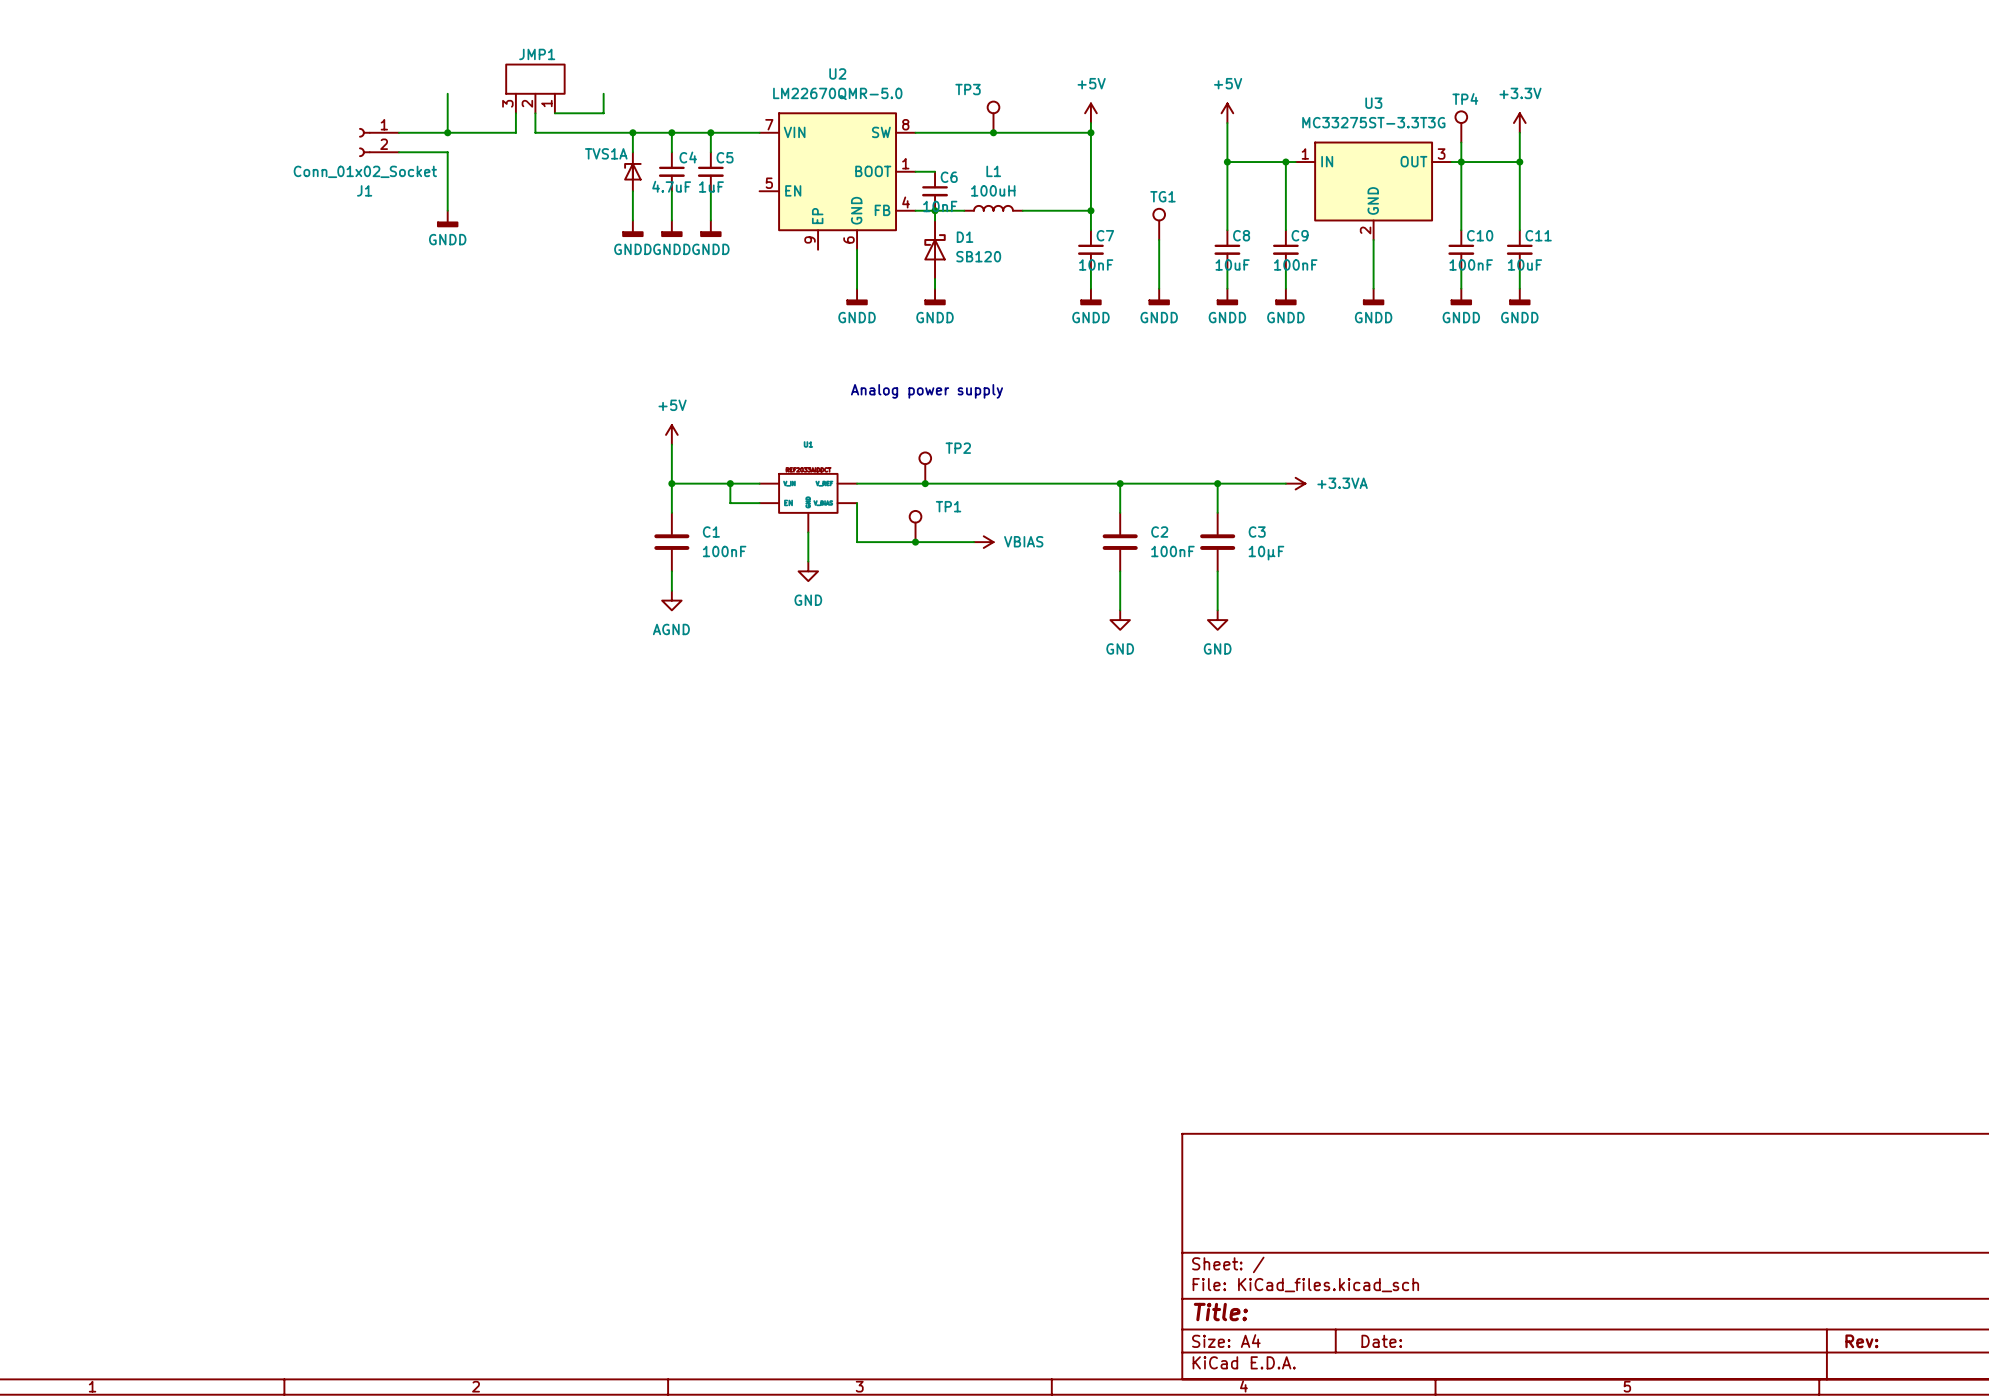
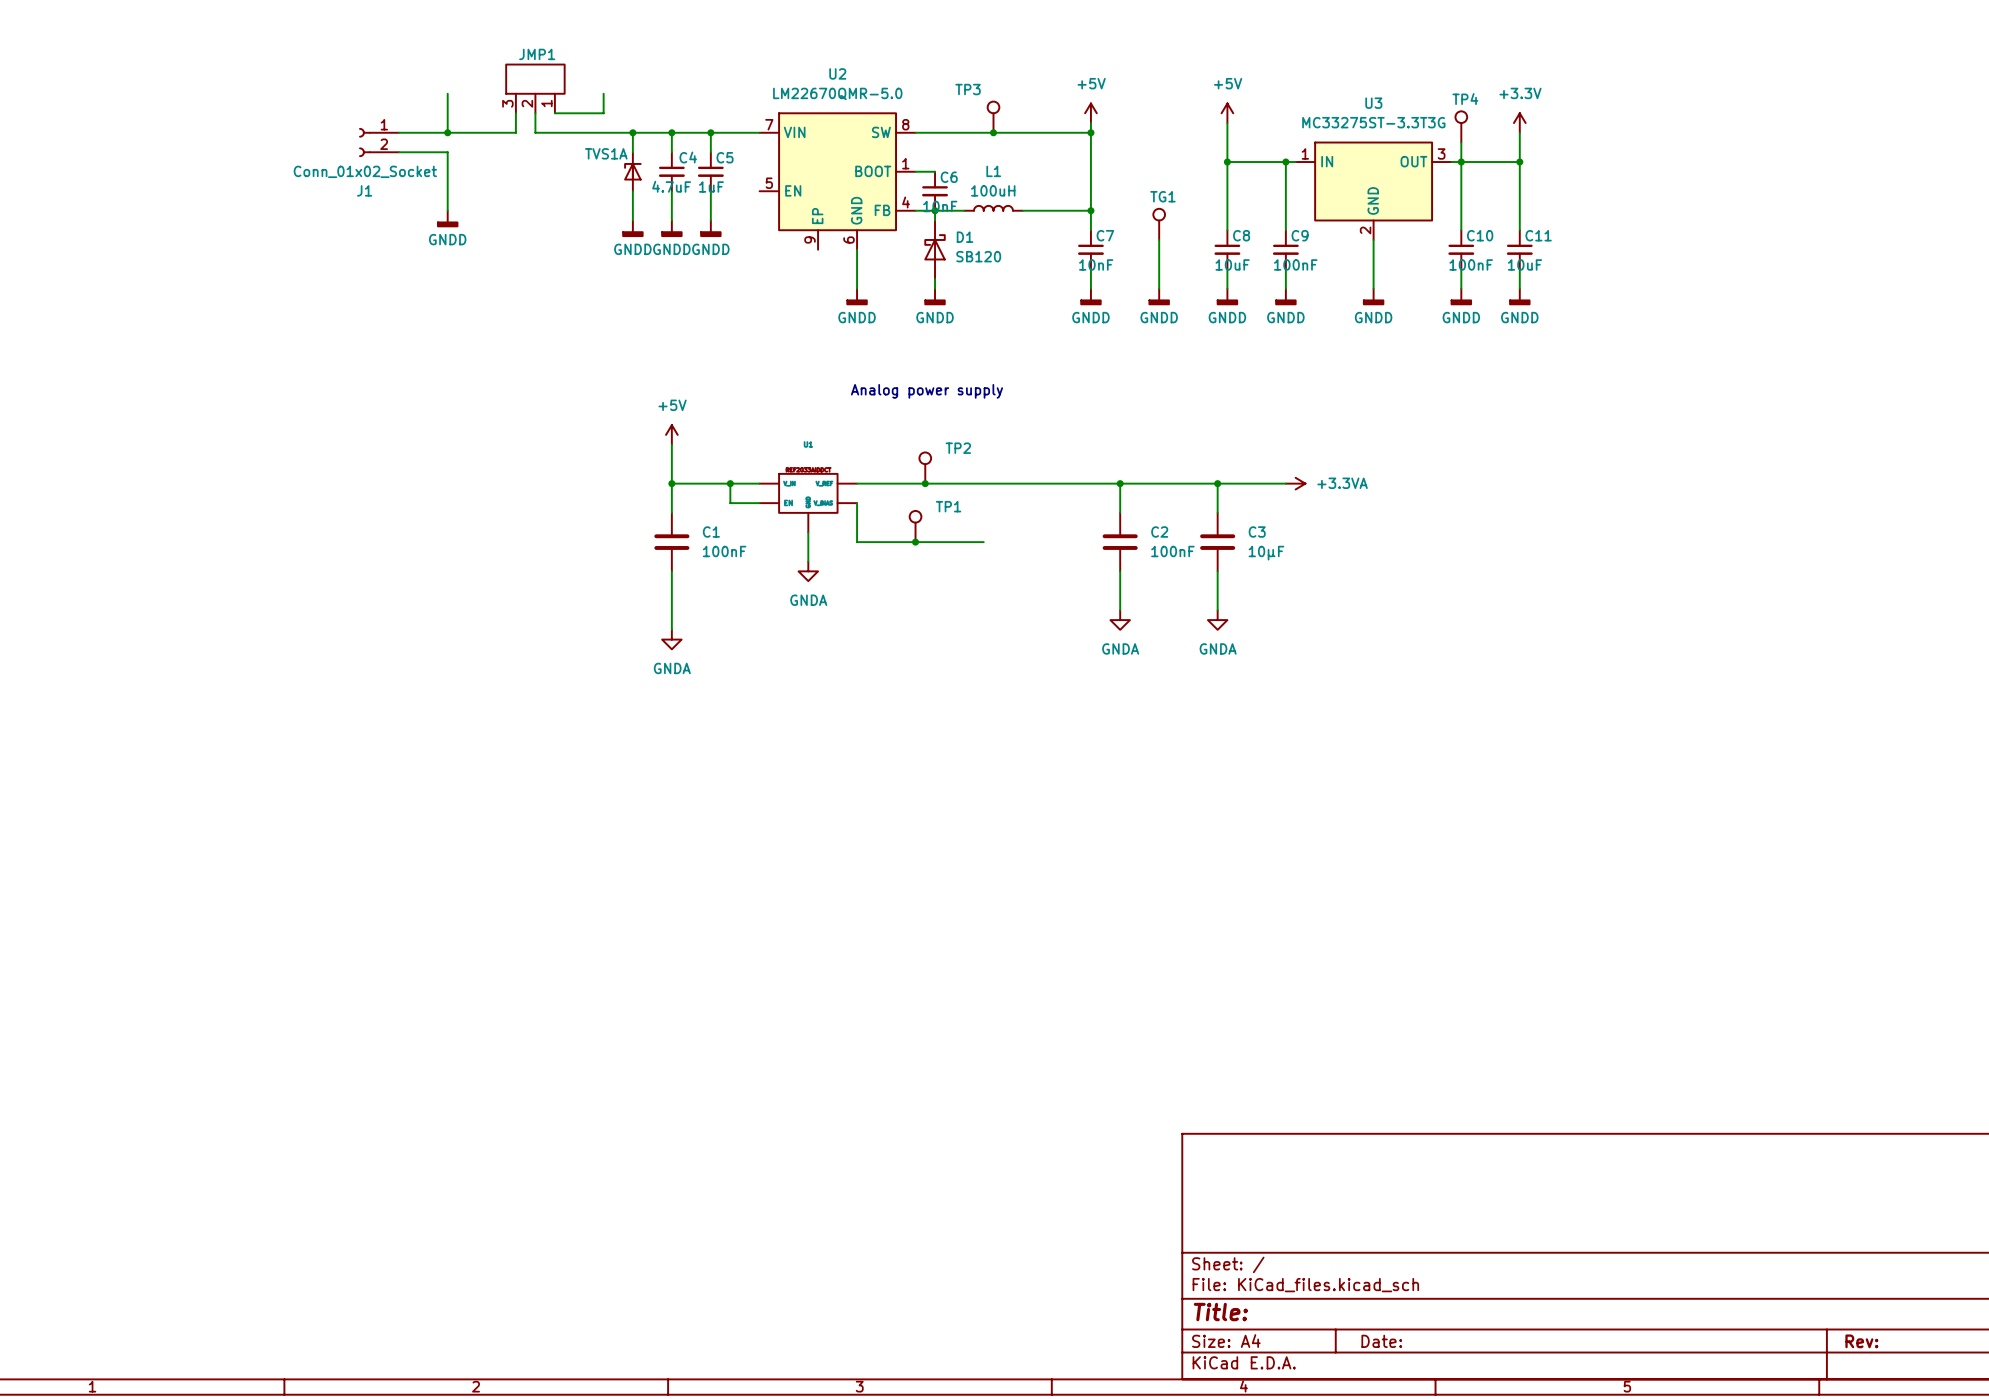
power symbol: VBIAS (983, 542) -> none
power symbol: GND (808, 571) -> GNDA (808, 571)
wire: none -> (671, 590) (671, 629)
power symbol: AGND (671, 600) -> none
power symbol: GND (1120, 620) -> GNDA (1120, 620)
power symbol: GND (1217, 620) -> GNDA (1217, 620)
power symbol: none -> GNDA (671, 639)

